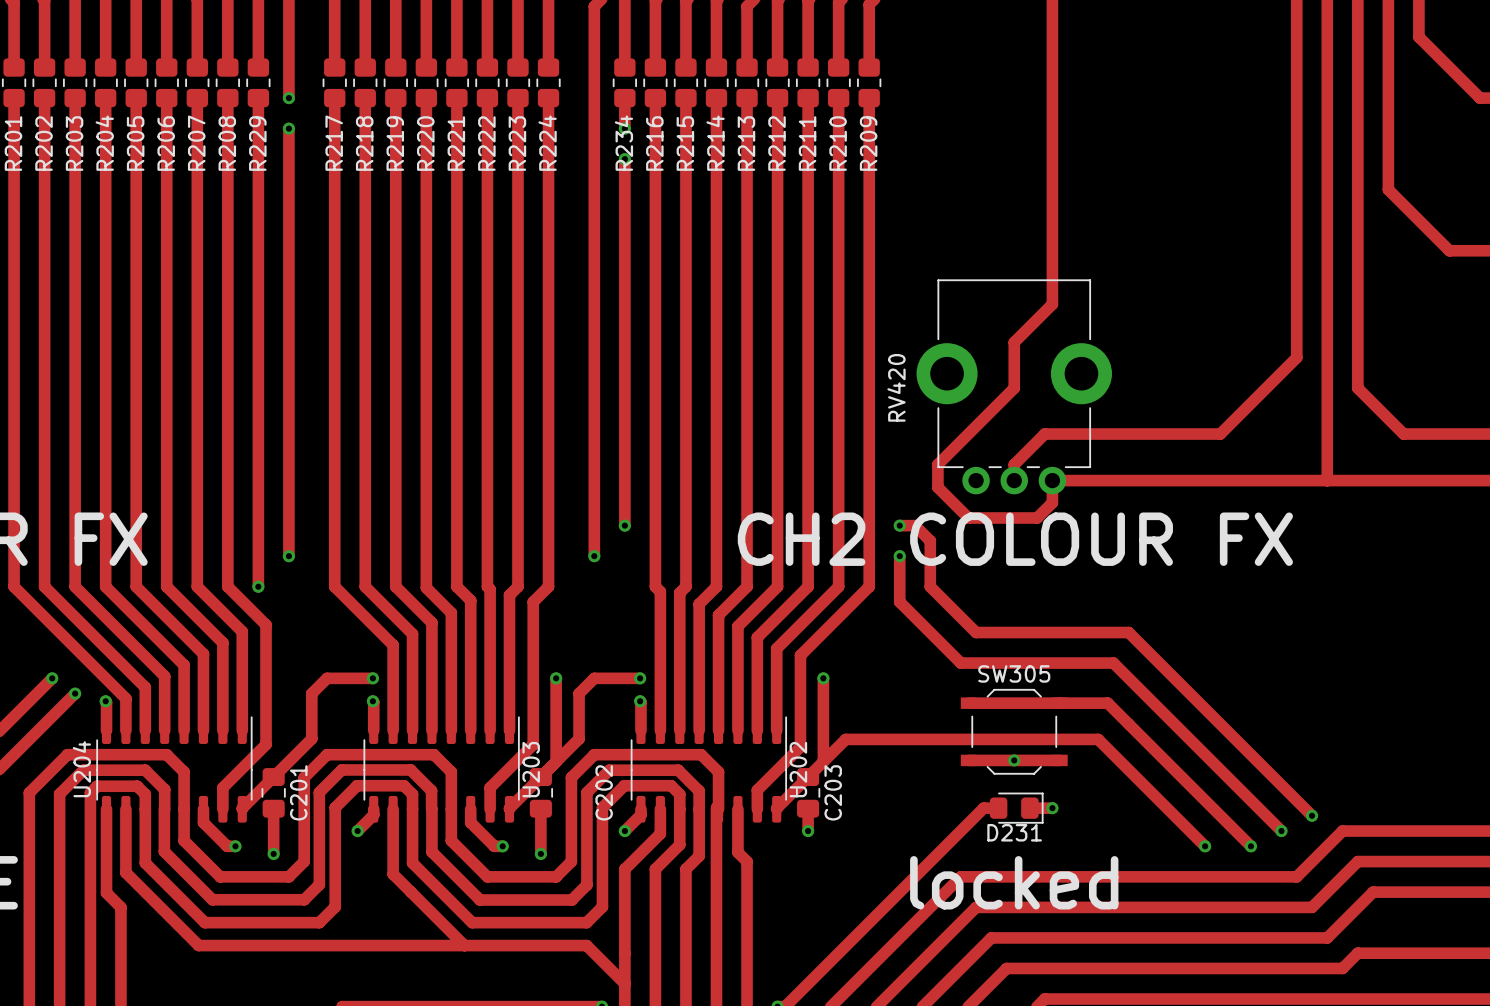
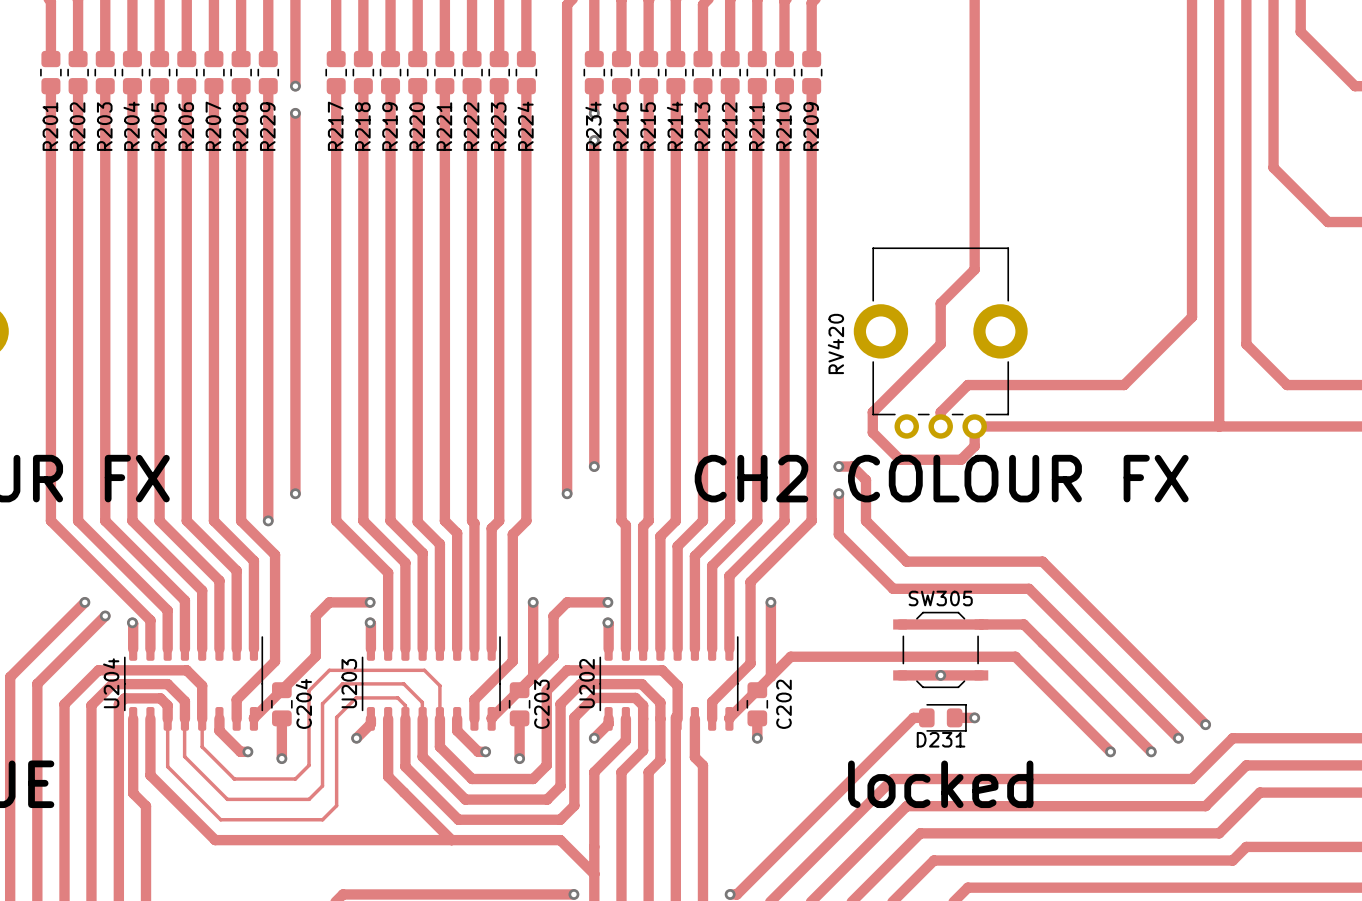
U203 name position: U203 (531, 769) -> U203 (349, 683)
U202 name position: U202 (798, 769) -> U202 (587, 683)
C201 name: C201 (298, 792) -> C204 (303, 703)
C202 name: C202 (604, 792) -> C203 (541, 704)
C203 name: C203 (833, 792) -> C202 (783, 704)
track width: thick (145, 809) (145, 863) (204, 922) (319, 922) (335, 906) (335, 807) (357, 785) (403, 785) (412, 794) (412, 809) -> thin (167, 718) (167, 766) (220, 819) (322, 819) (336, 805) (336, 717) (356, 697) (397, 697) (405, 705) (405, 718)
track width: thick (164, 809) (164, 851) (212, 899) (304, 899) (319, 884) (319, 792) (341, 769) (410, 769) (431, 790) (431, 809) -> thin (184, 718) (184, 756) (227, 799) (309, 799) (322, 785) (322, 703) (342, 683) (403, 683) (422, 702) (422, 718)
track width: thick (184, 809) (184, 840) (220, 876) (288, 876) (304, 861) (304, 777) (327, 754) (433, 754) (451, 772) (451, 809) -> thin (202, 718) (202, 746) (234, 779) (295, 779) (309, 765) (309, 690) (329, 670) (424, 670) (439, 685) (439, 718)

